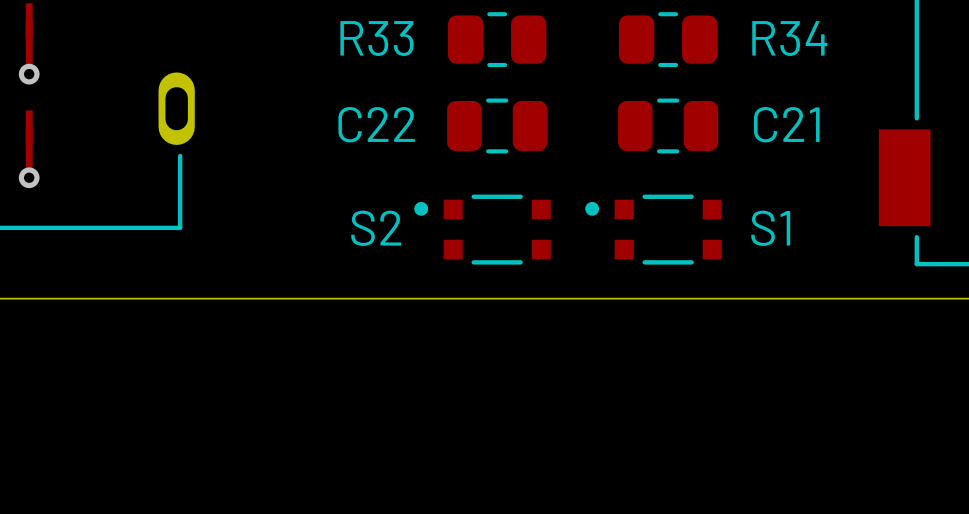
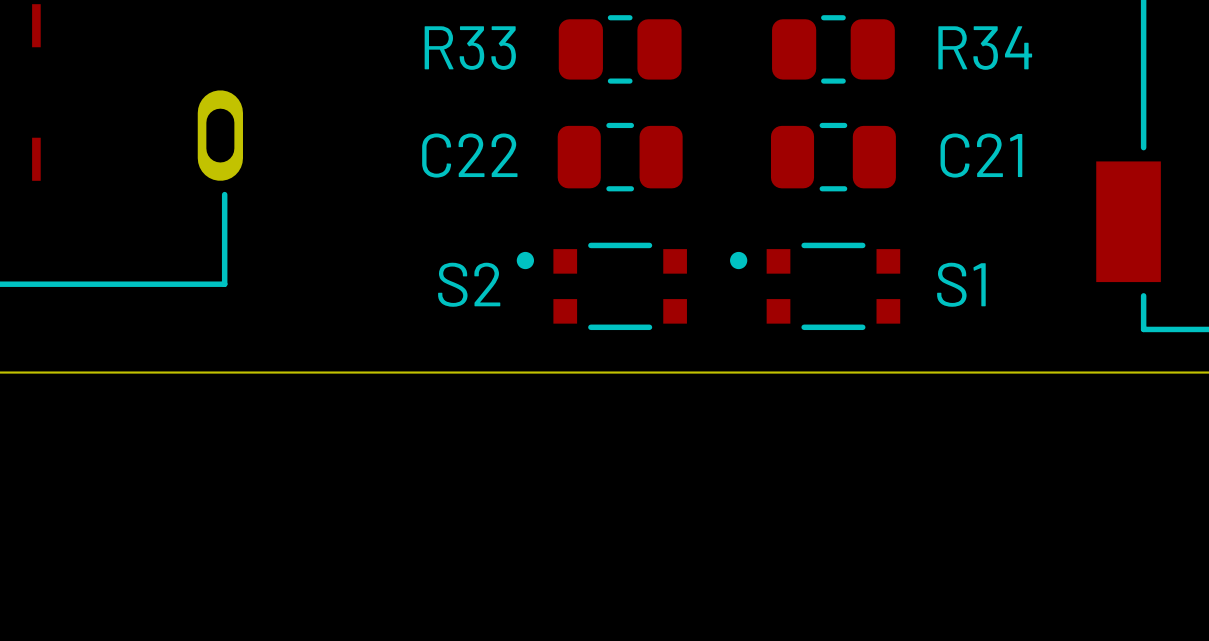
track: (29, 20) (29, 74) -> none
via: (29, 74) -> none
track: (29, 127) (29, 177) -> none
via: (29, 177) -> none

